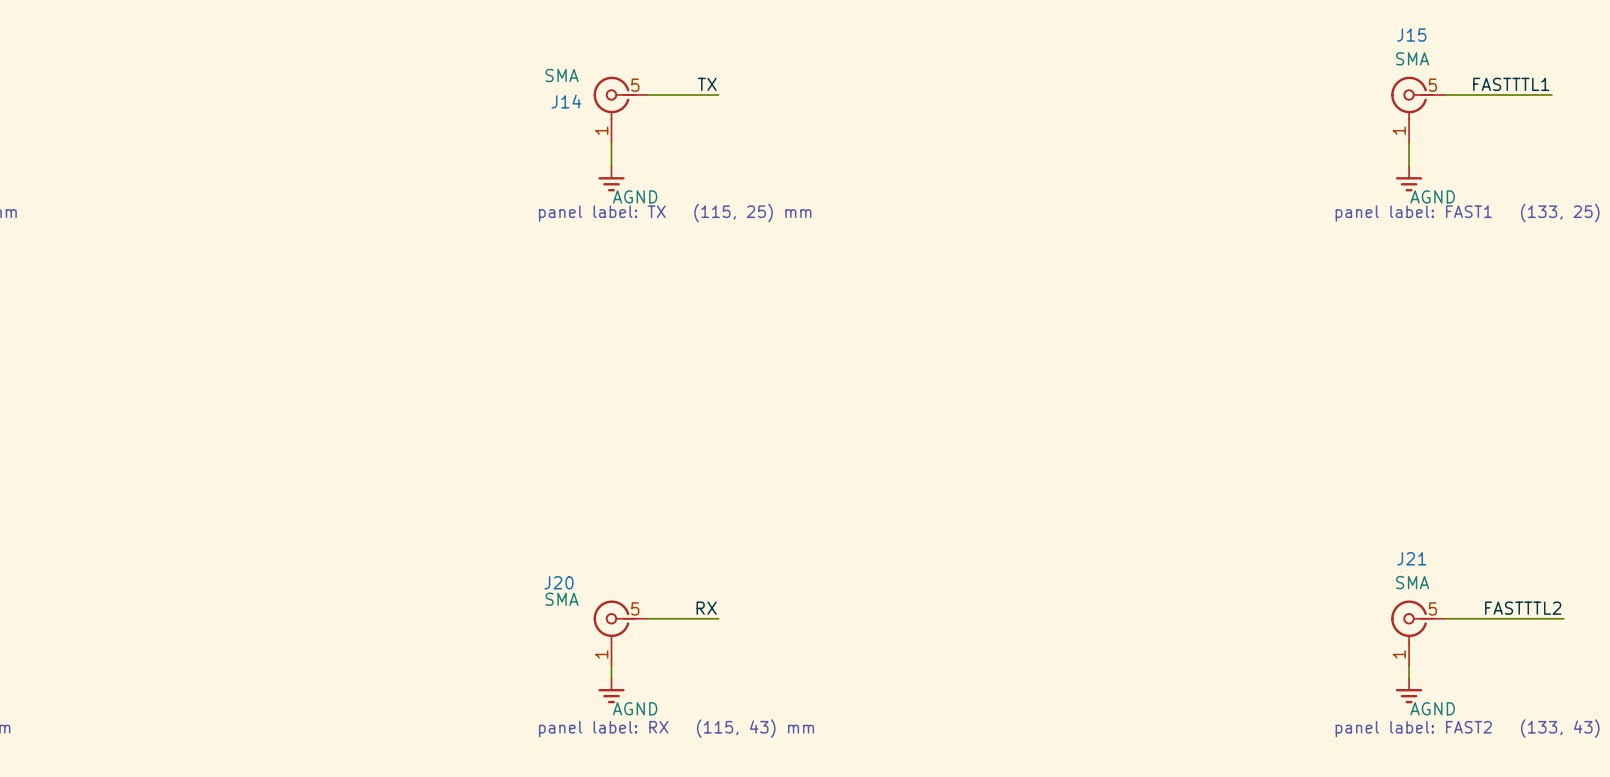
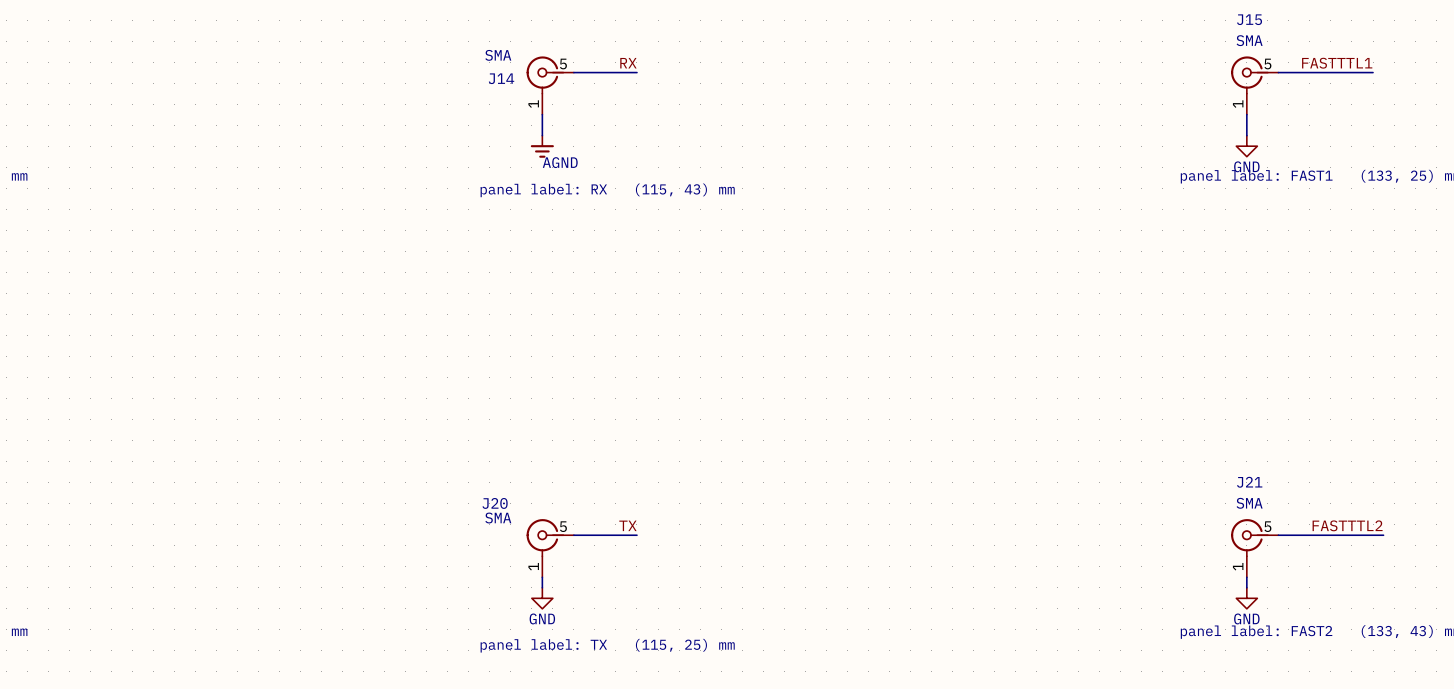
label: TX (707, 84) -> RX (628, 63)
power symbol: AGND (1409, 178) -> GND (1246, 146)
text: panel label: TX (115, 25) mm (675, 213) -> panel label: RX (115, 43) mm (607, 190)
label: RX (706, 608) -> TX (627, 525)
power symbol: AGND (611, 690) -> GND (542, 598)
power symbol: AGND (1409, 690) -> GND (1246, 598)
text: panel label: RX (115, 43) mm (676, 728) -> panel label: TX (115, 25) mm (607, 645)

